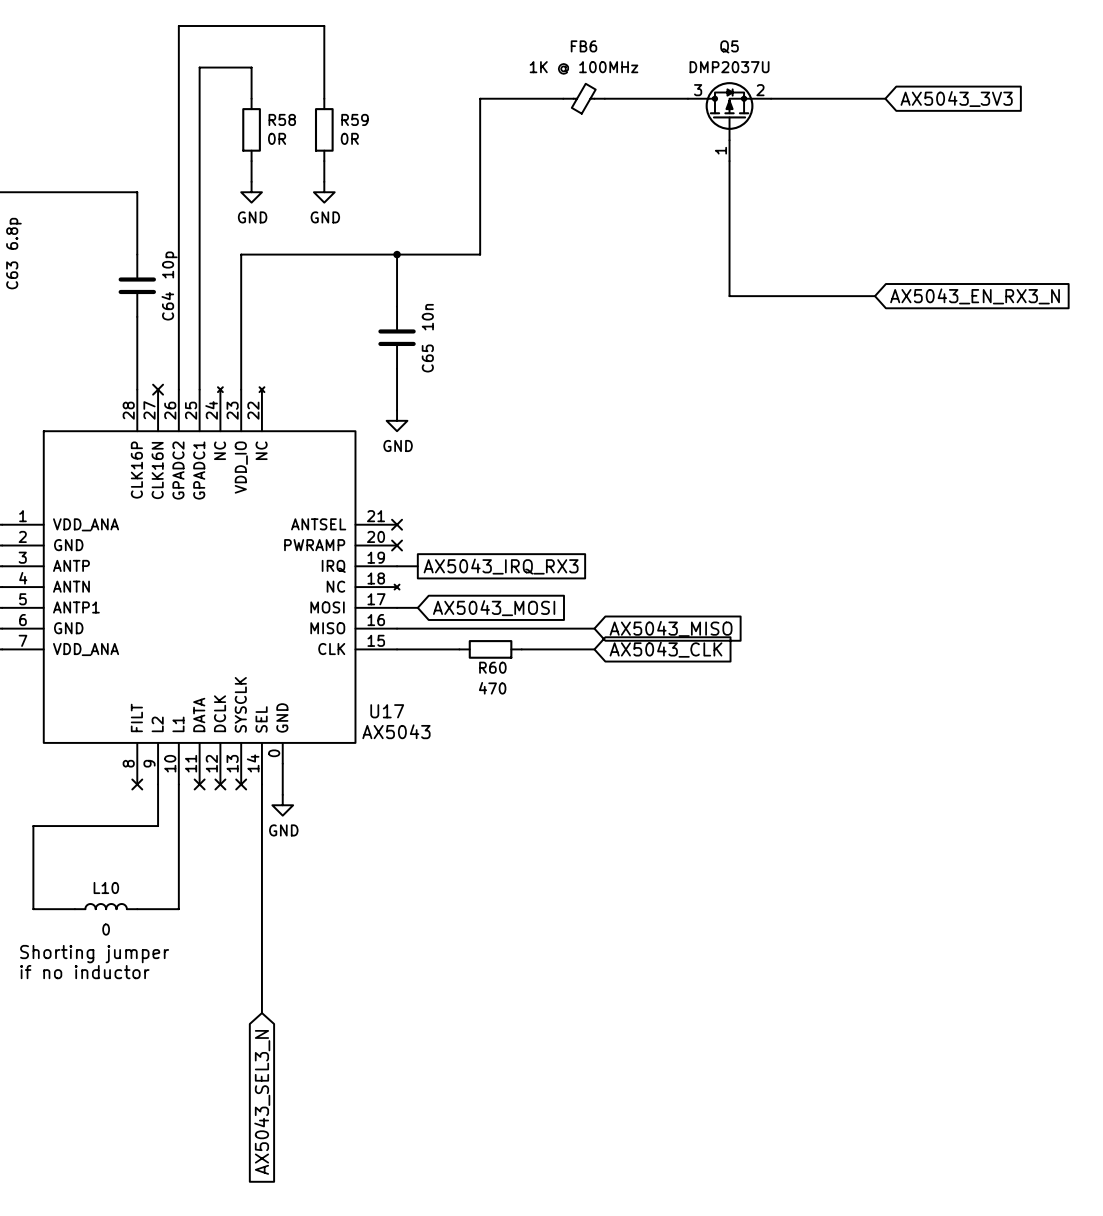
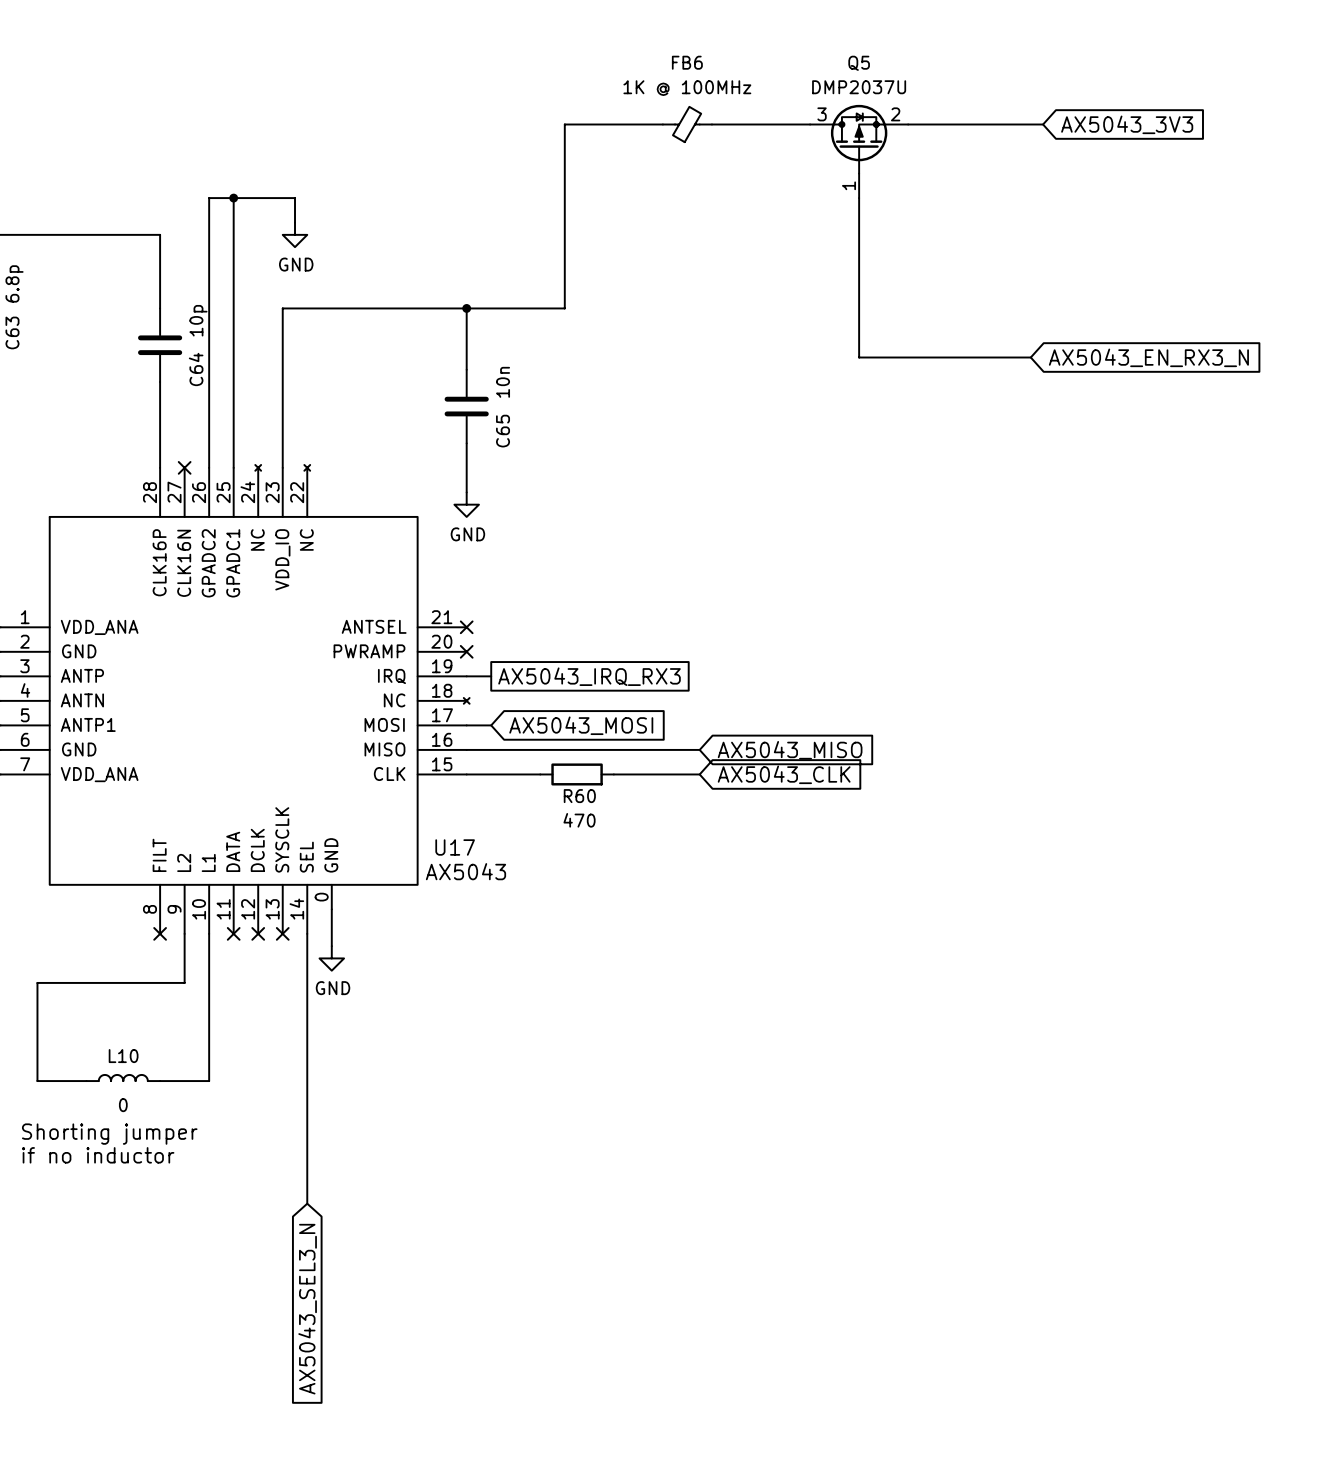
wire: (251, 98) (251, 67) (199, 67) (199, 161) -> none
wire: (324, 98) (324, 25) (178, 25) (178, 161) -> (295, 198) (209, 198)
R58: 0R (251, 129) -> none
R59: 0R (324, 129) -> none
junction: none -> (233, 198)
wire: (324, 161) (324, 181) -> none
power symbol: GND (324, 192) -> none

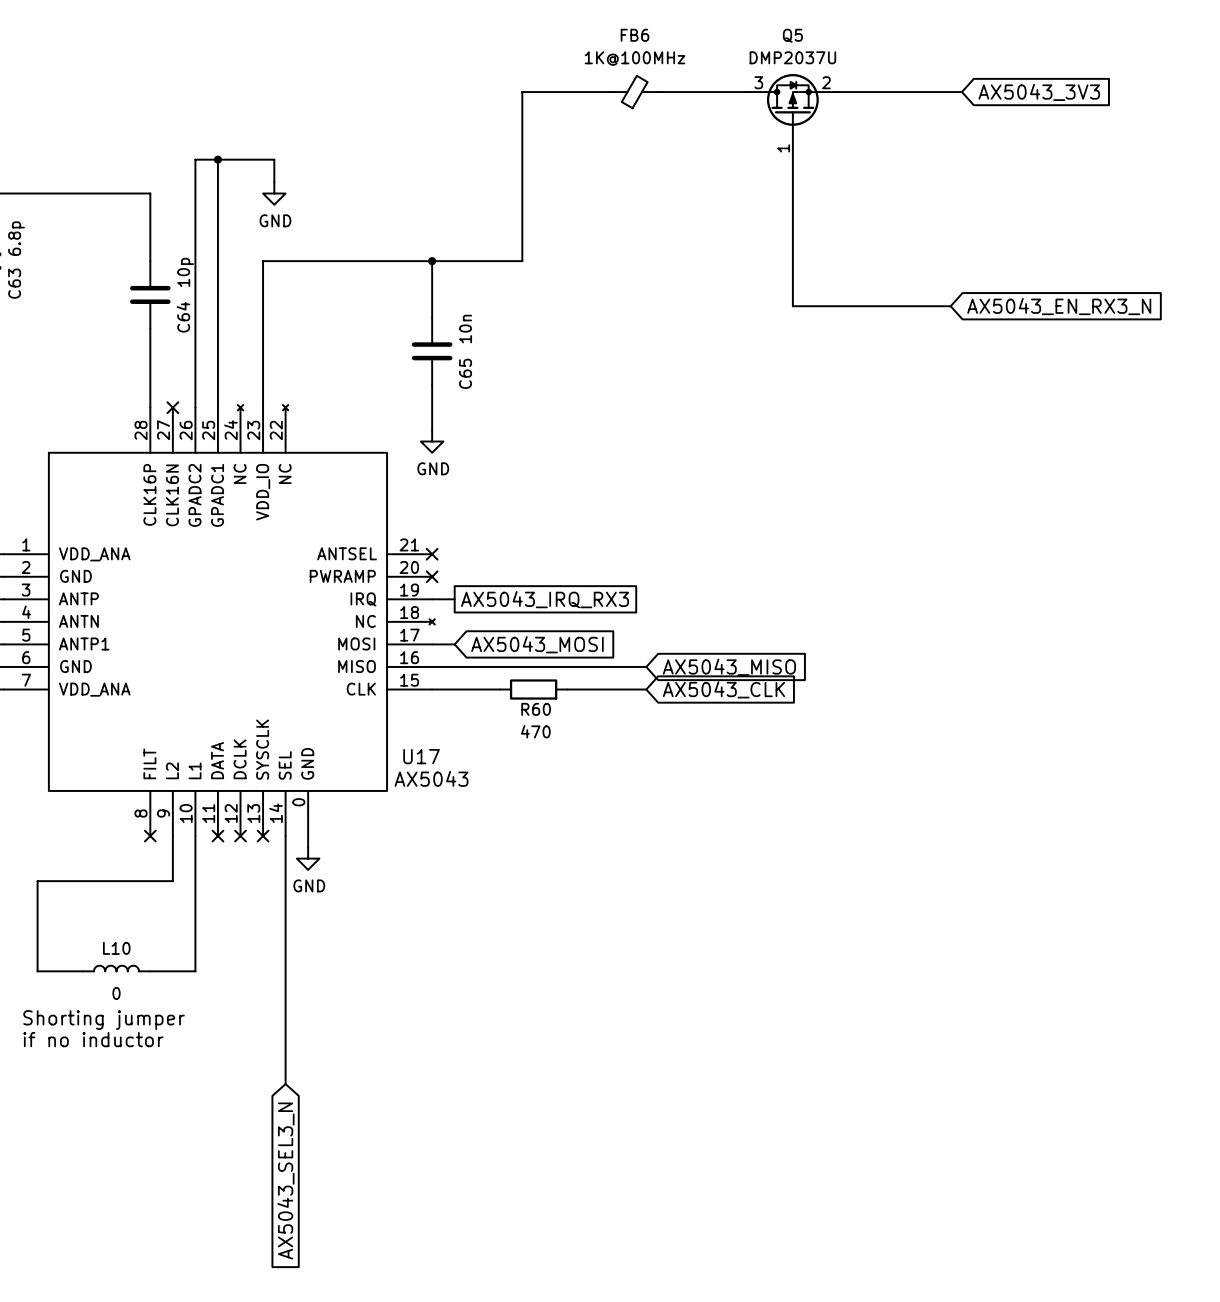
FB6 value: 1K @ 100MHz (687, 88) -> 1K@100MHz (634, 58)

